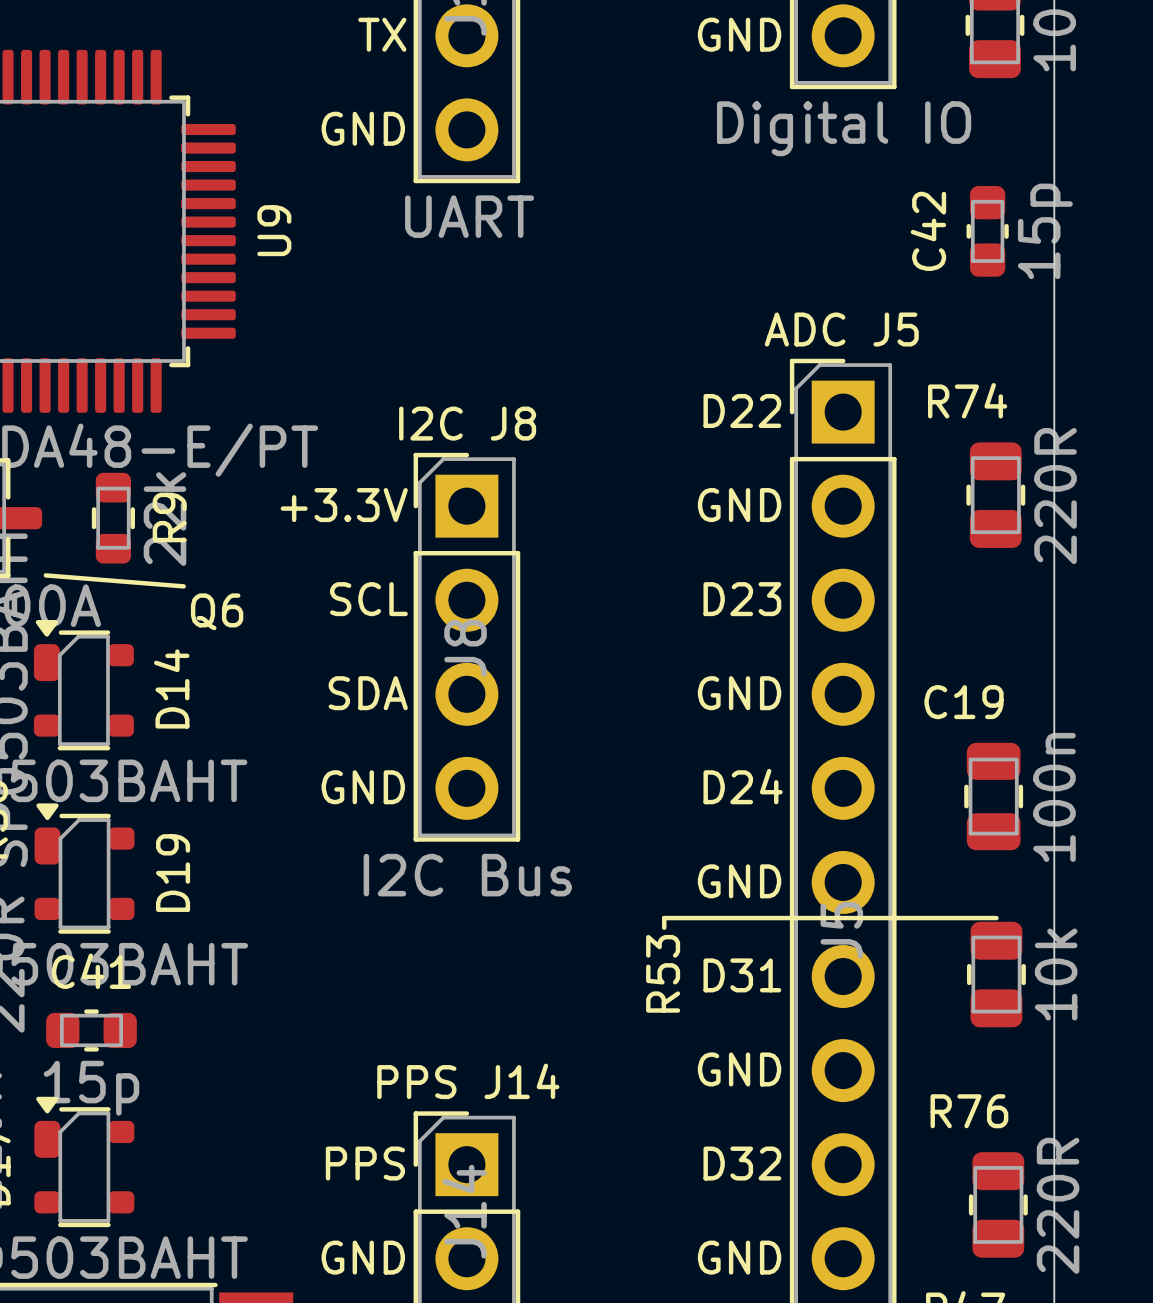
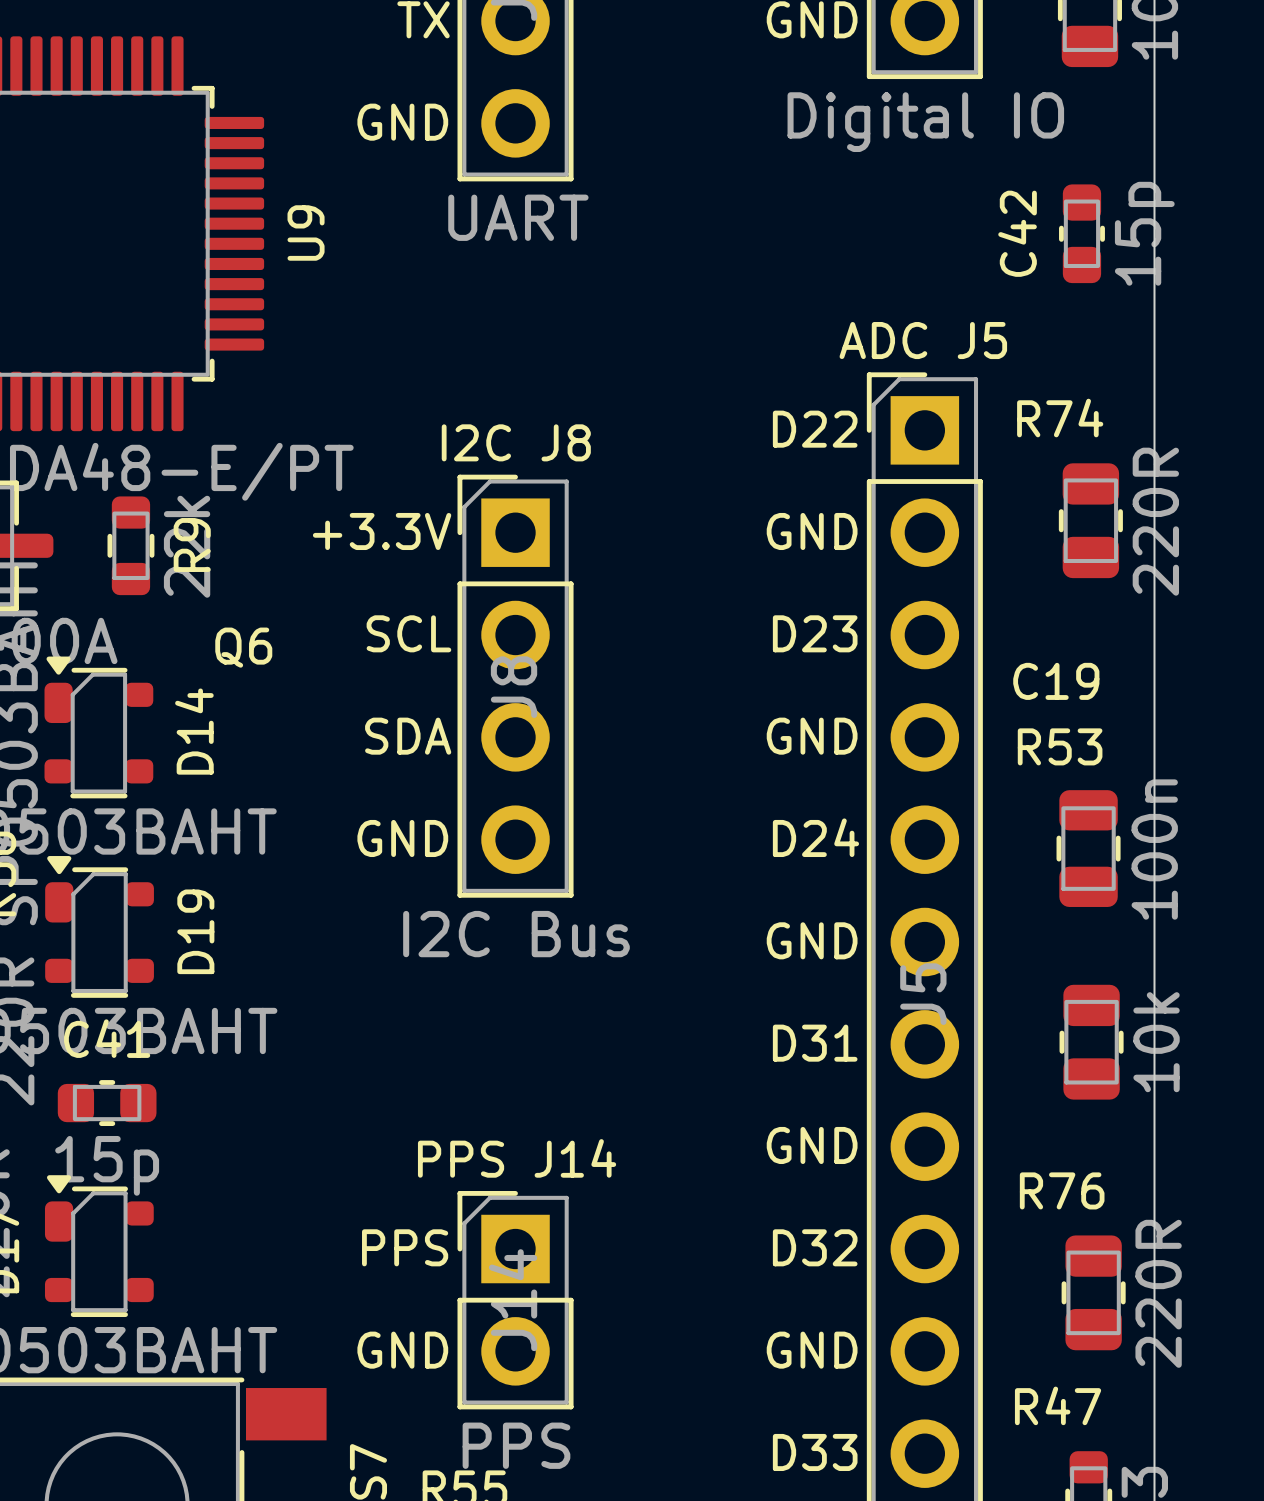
line: (45, 575) (183, 586) -> none
C19 name position: C19 (964, 702) -> C19 (1056, 681)
line: (996, 918) (664, 918) (664, 927) -> none
R53 name rotation: 0° (663, 973) -> 90° clockwise (1060, 746)
R53 name position: R53 (663, 973) -> R53 (1060, 746)

